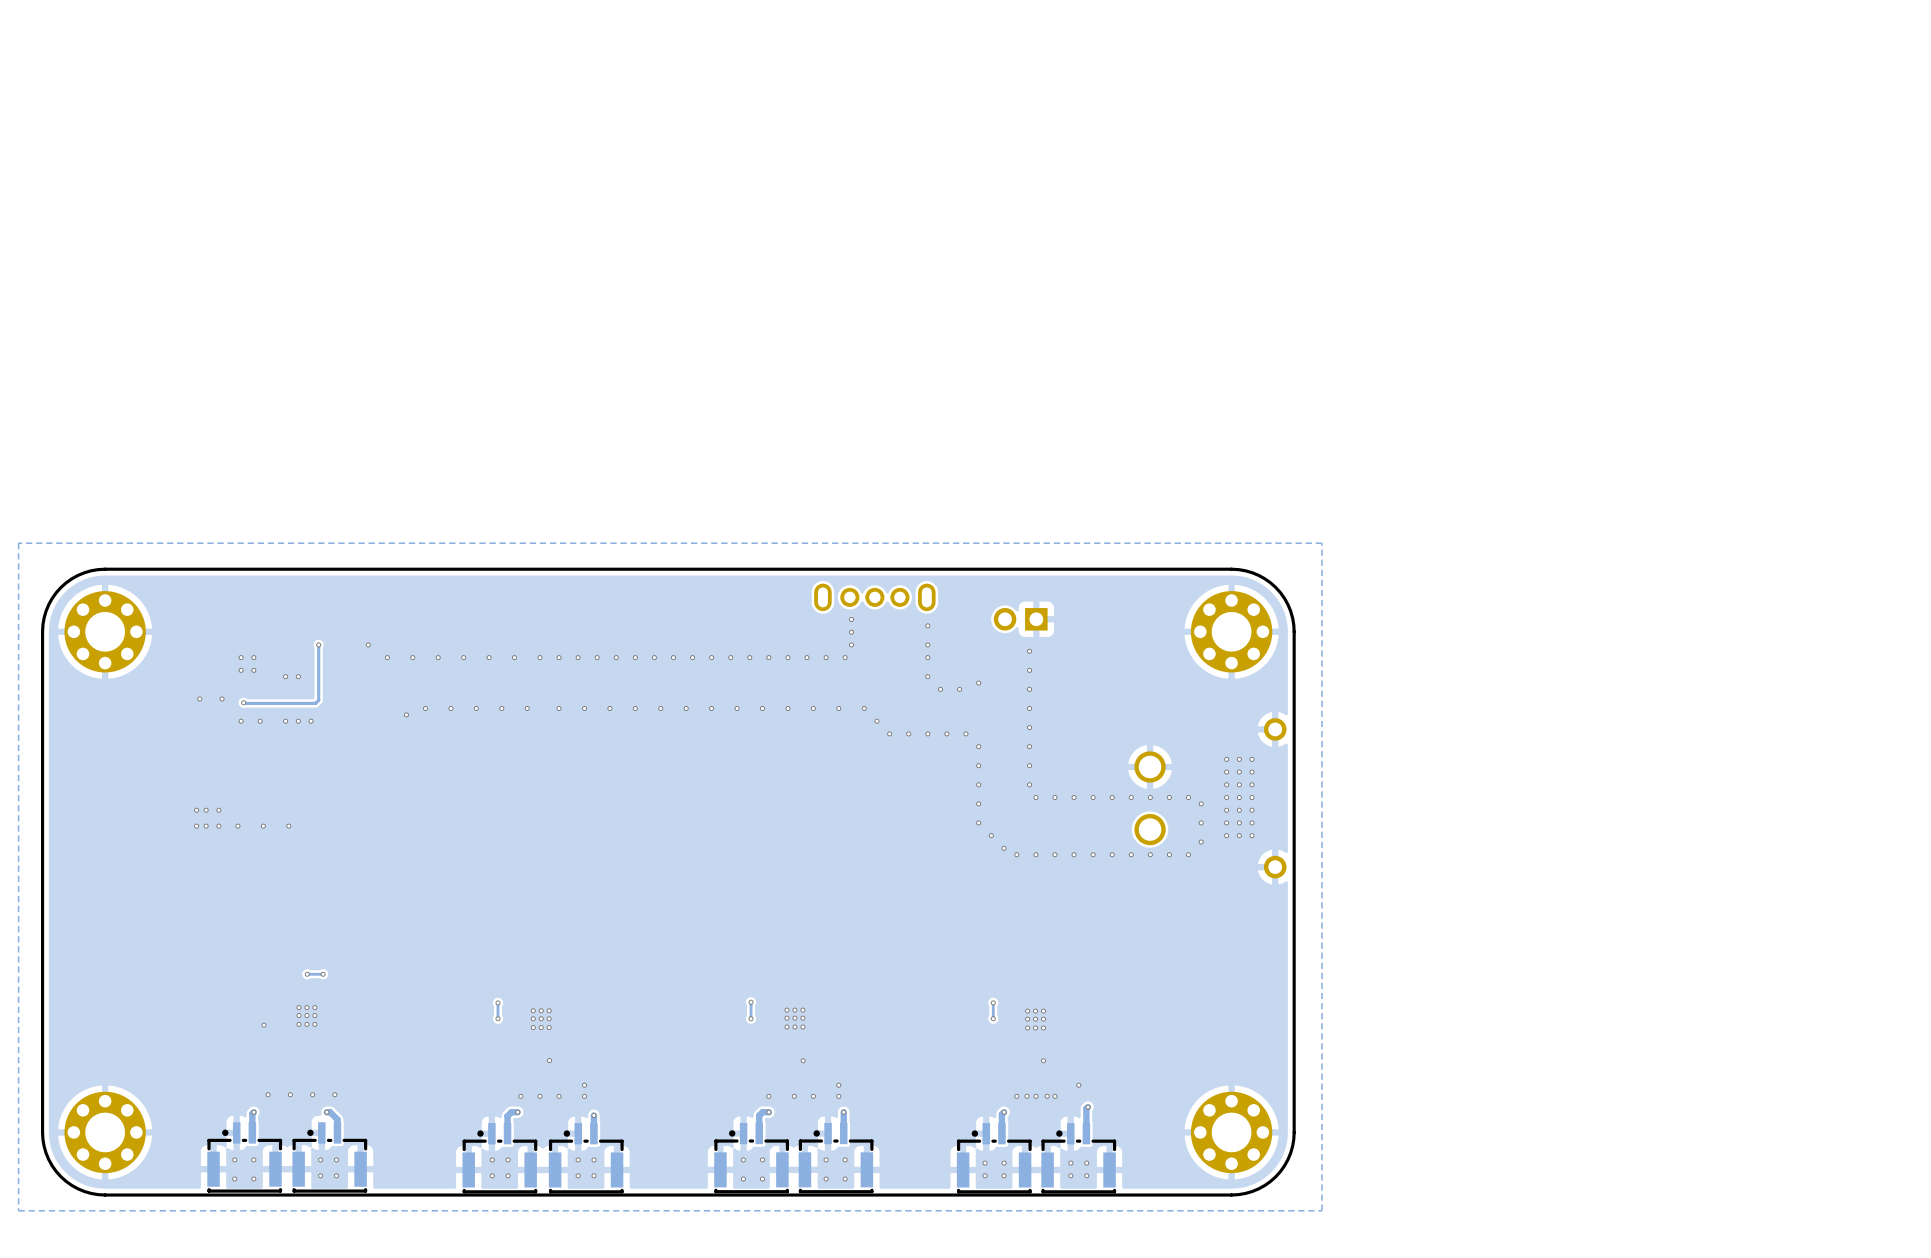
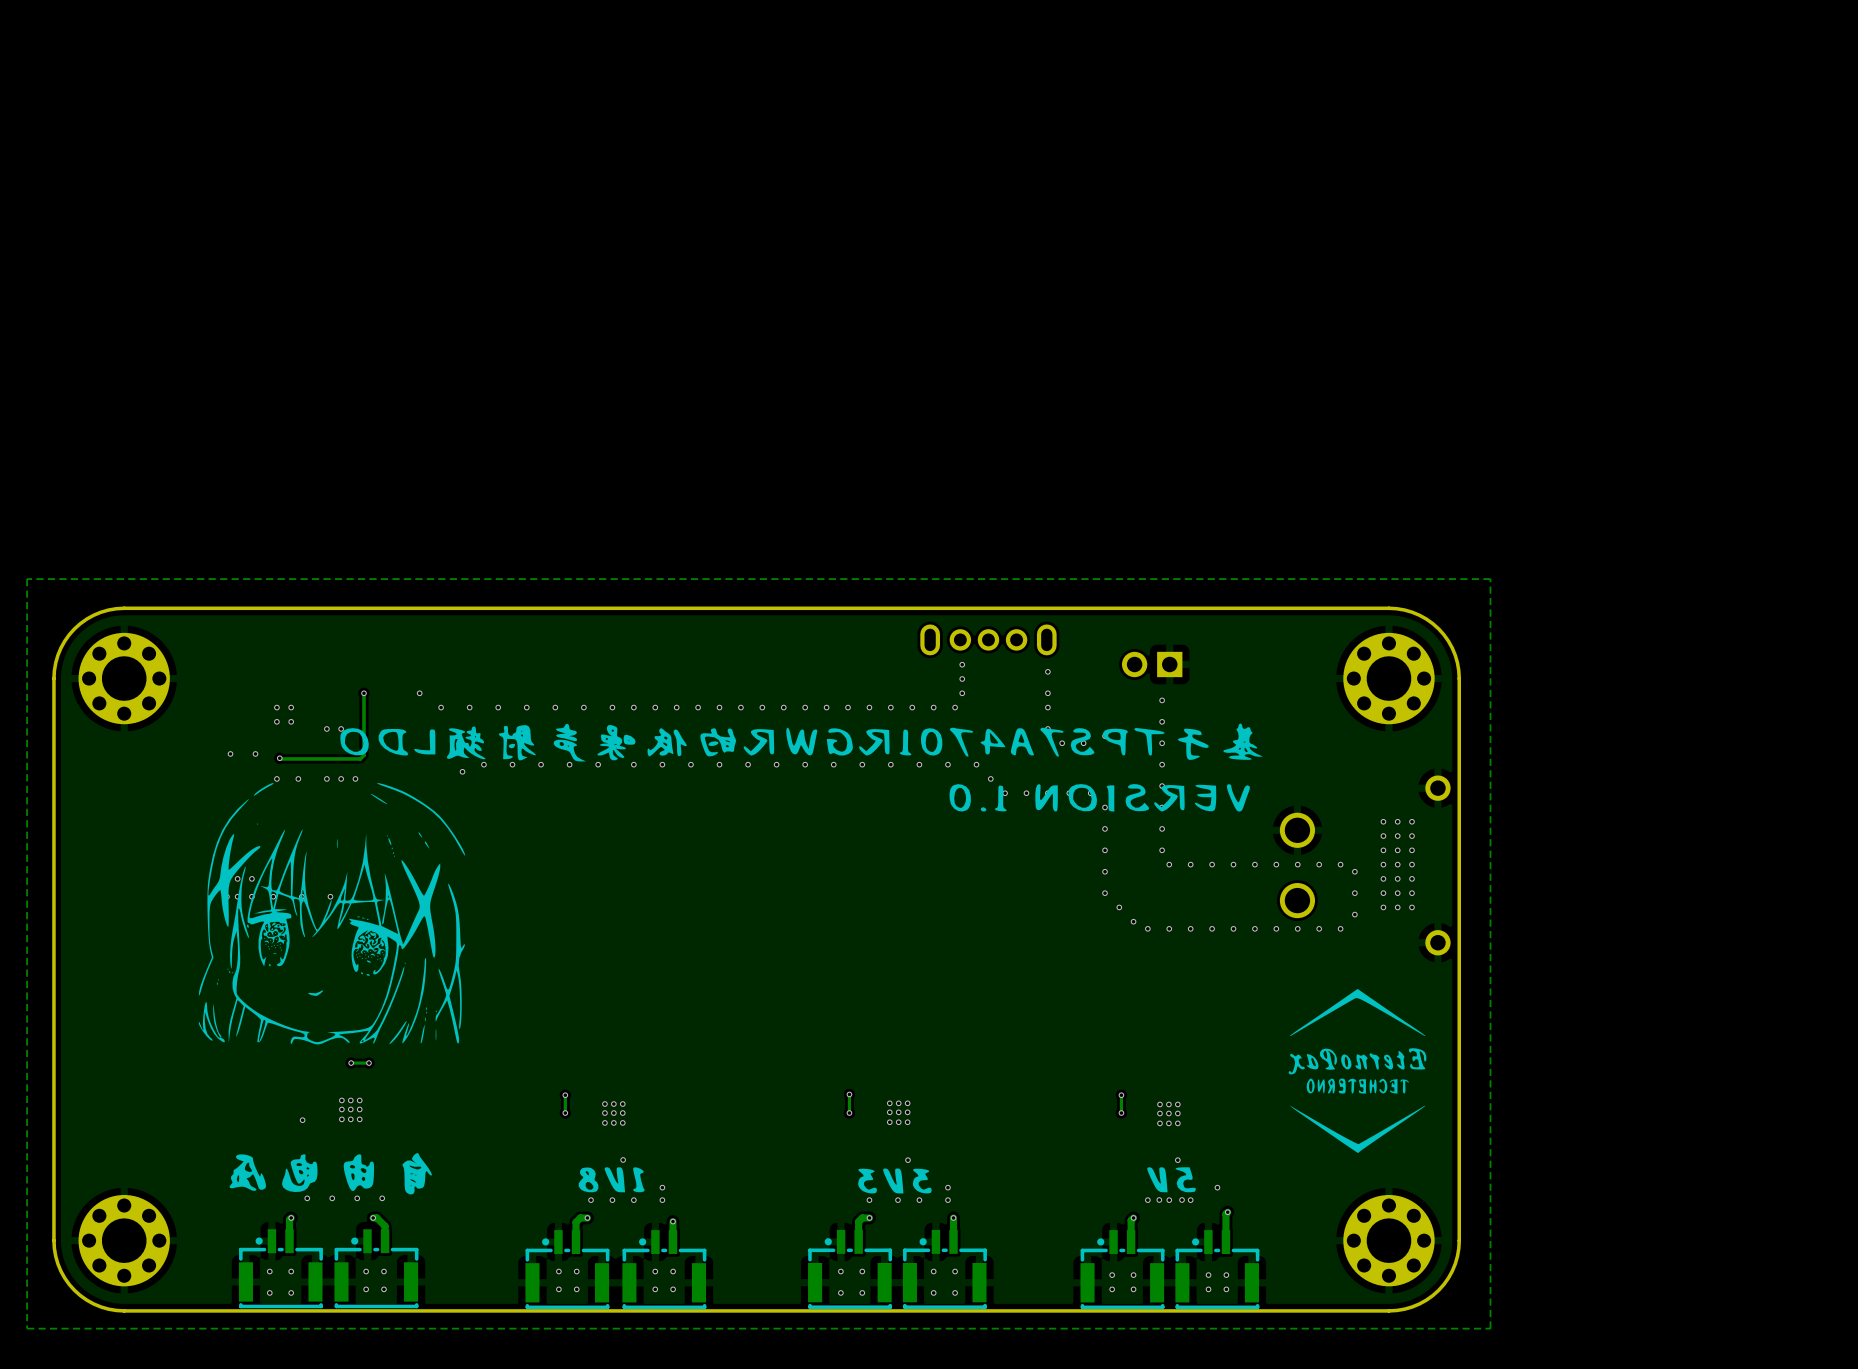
drawing: none -> [198, 723, 1427, 1195]

